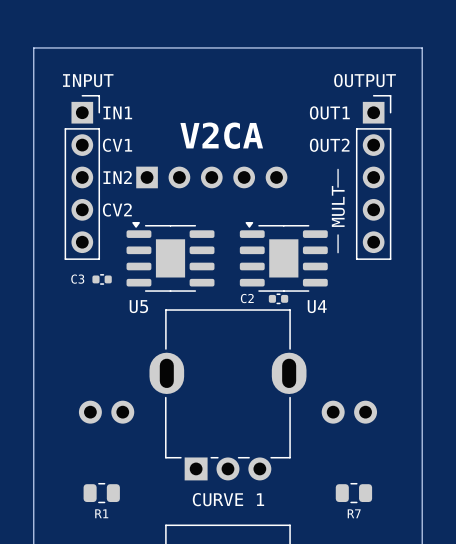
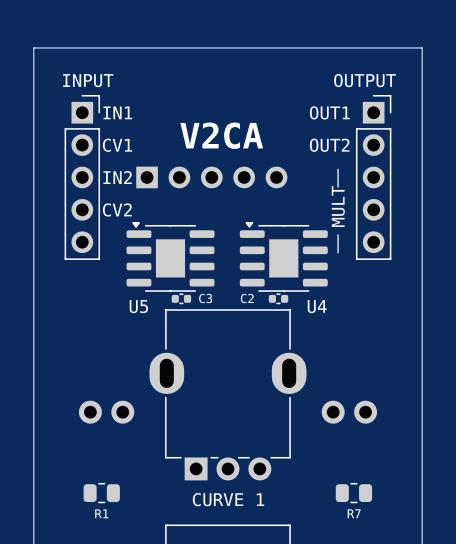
C3 name position: C3 (77, 279) -> C3 (205, 298)
C3 position: (102, 279) -> (181, 298)

